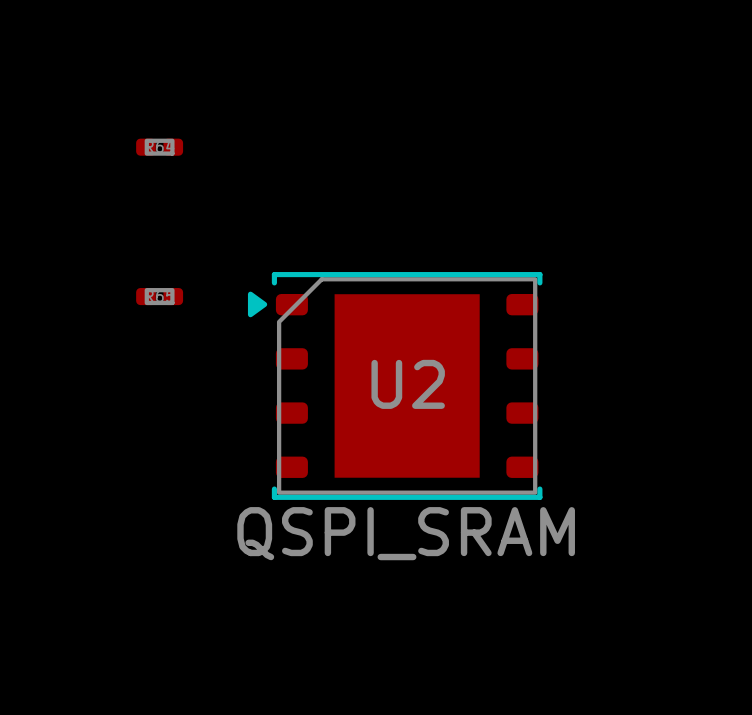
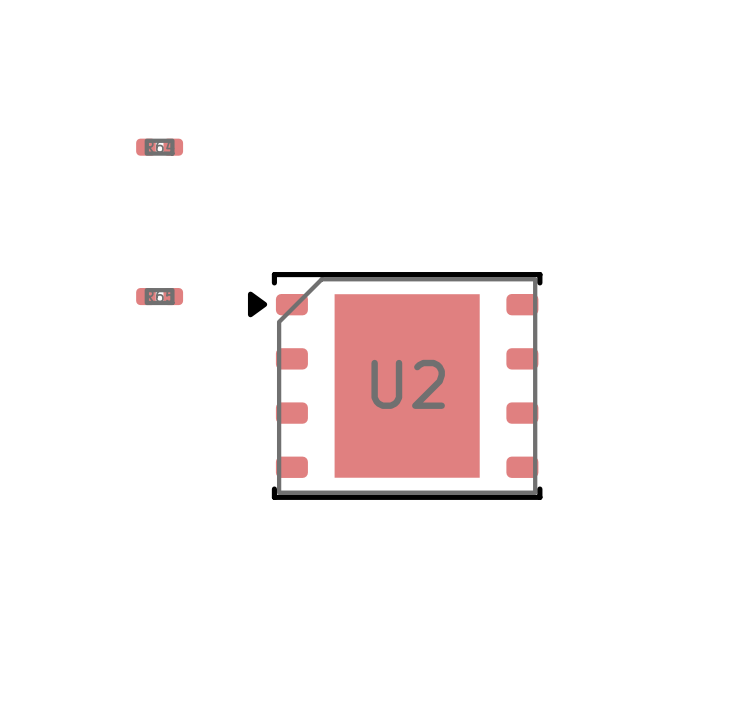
U2 value: QSPI_SRAM (406, 533) -> none

